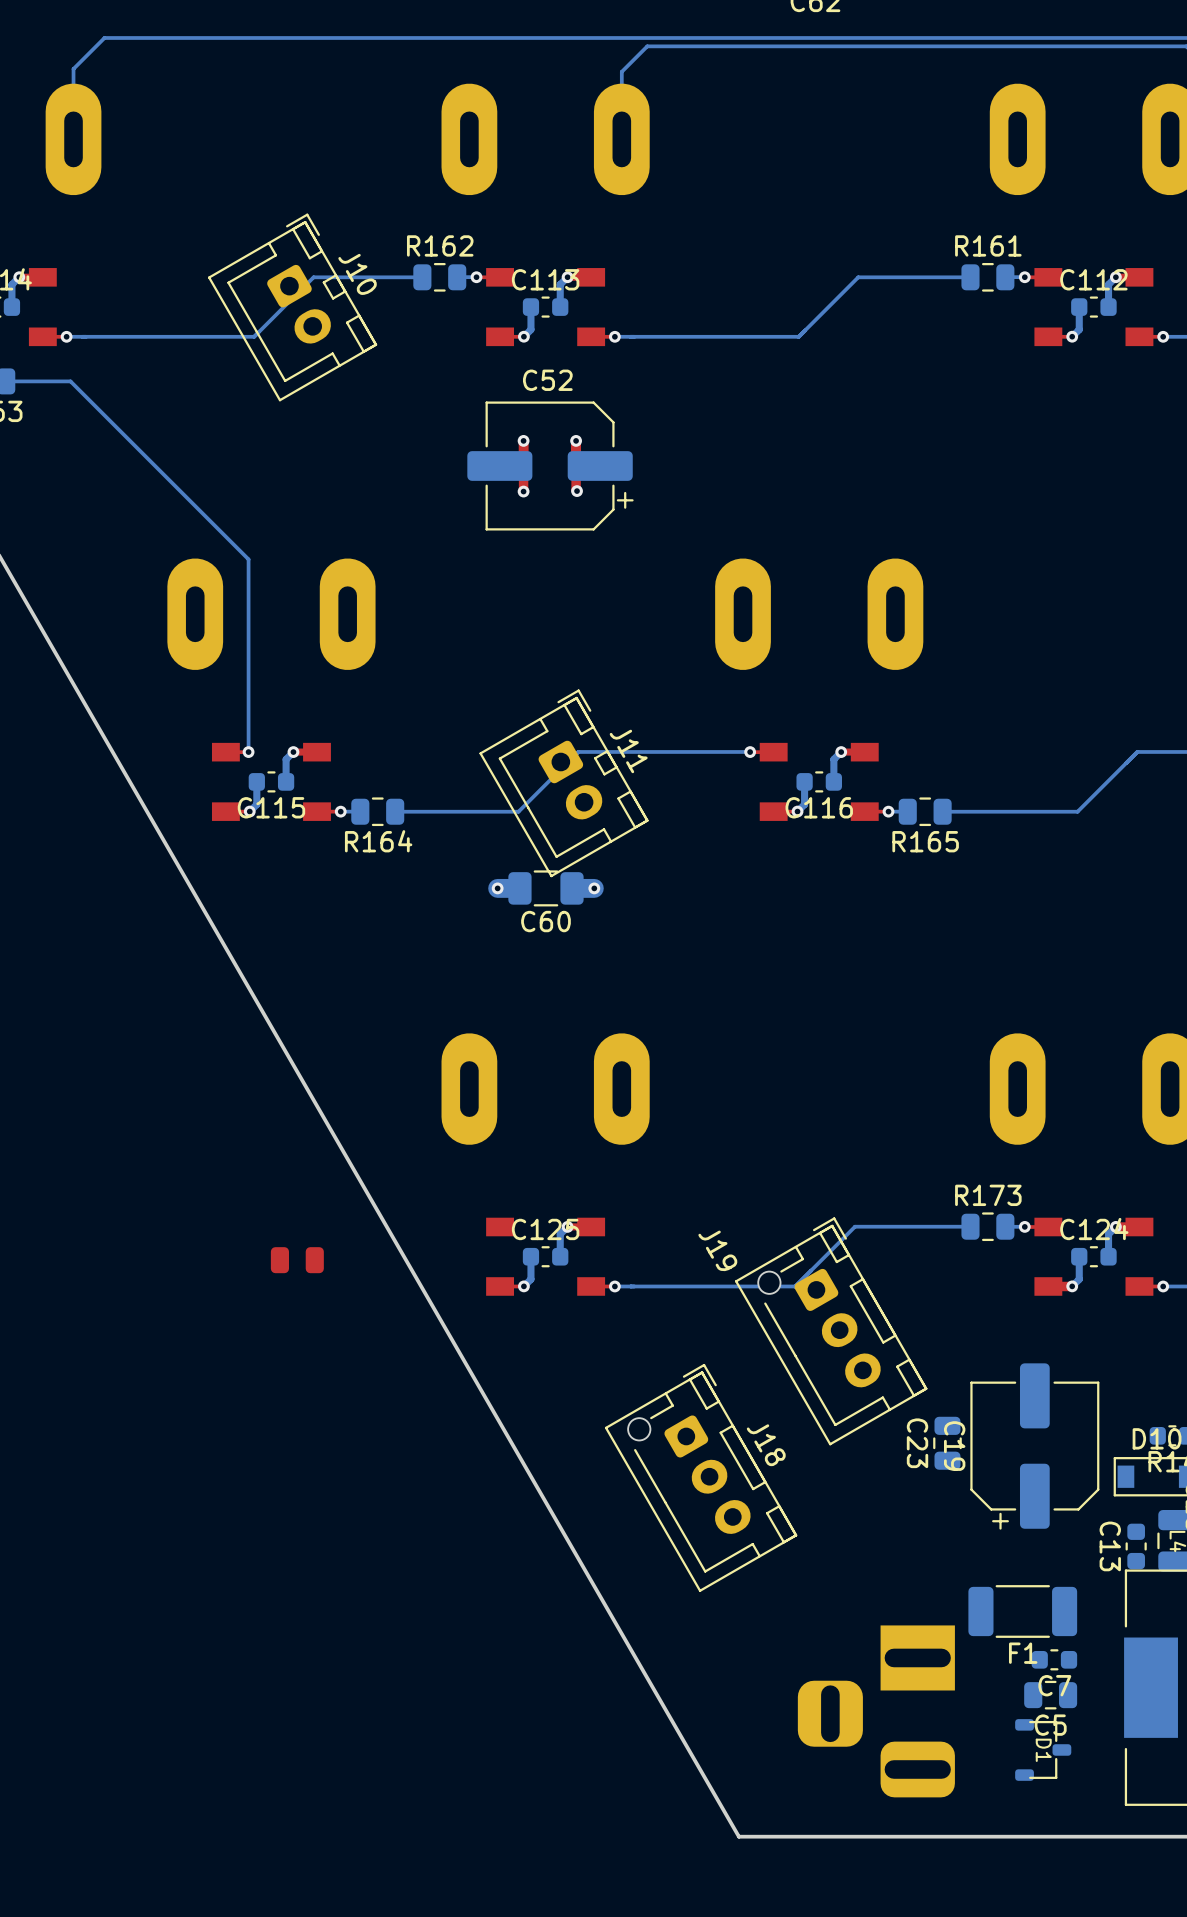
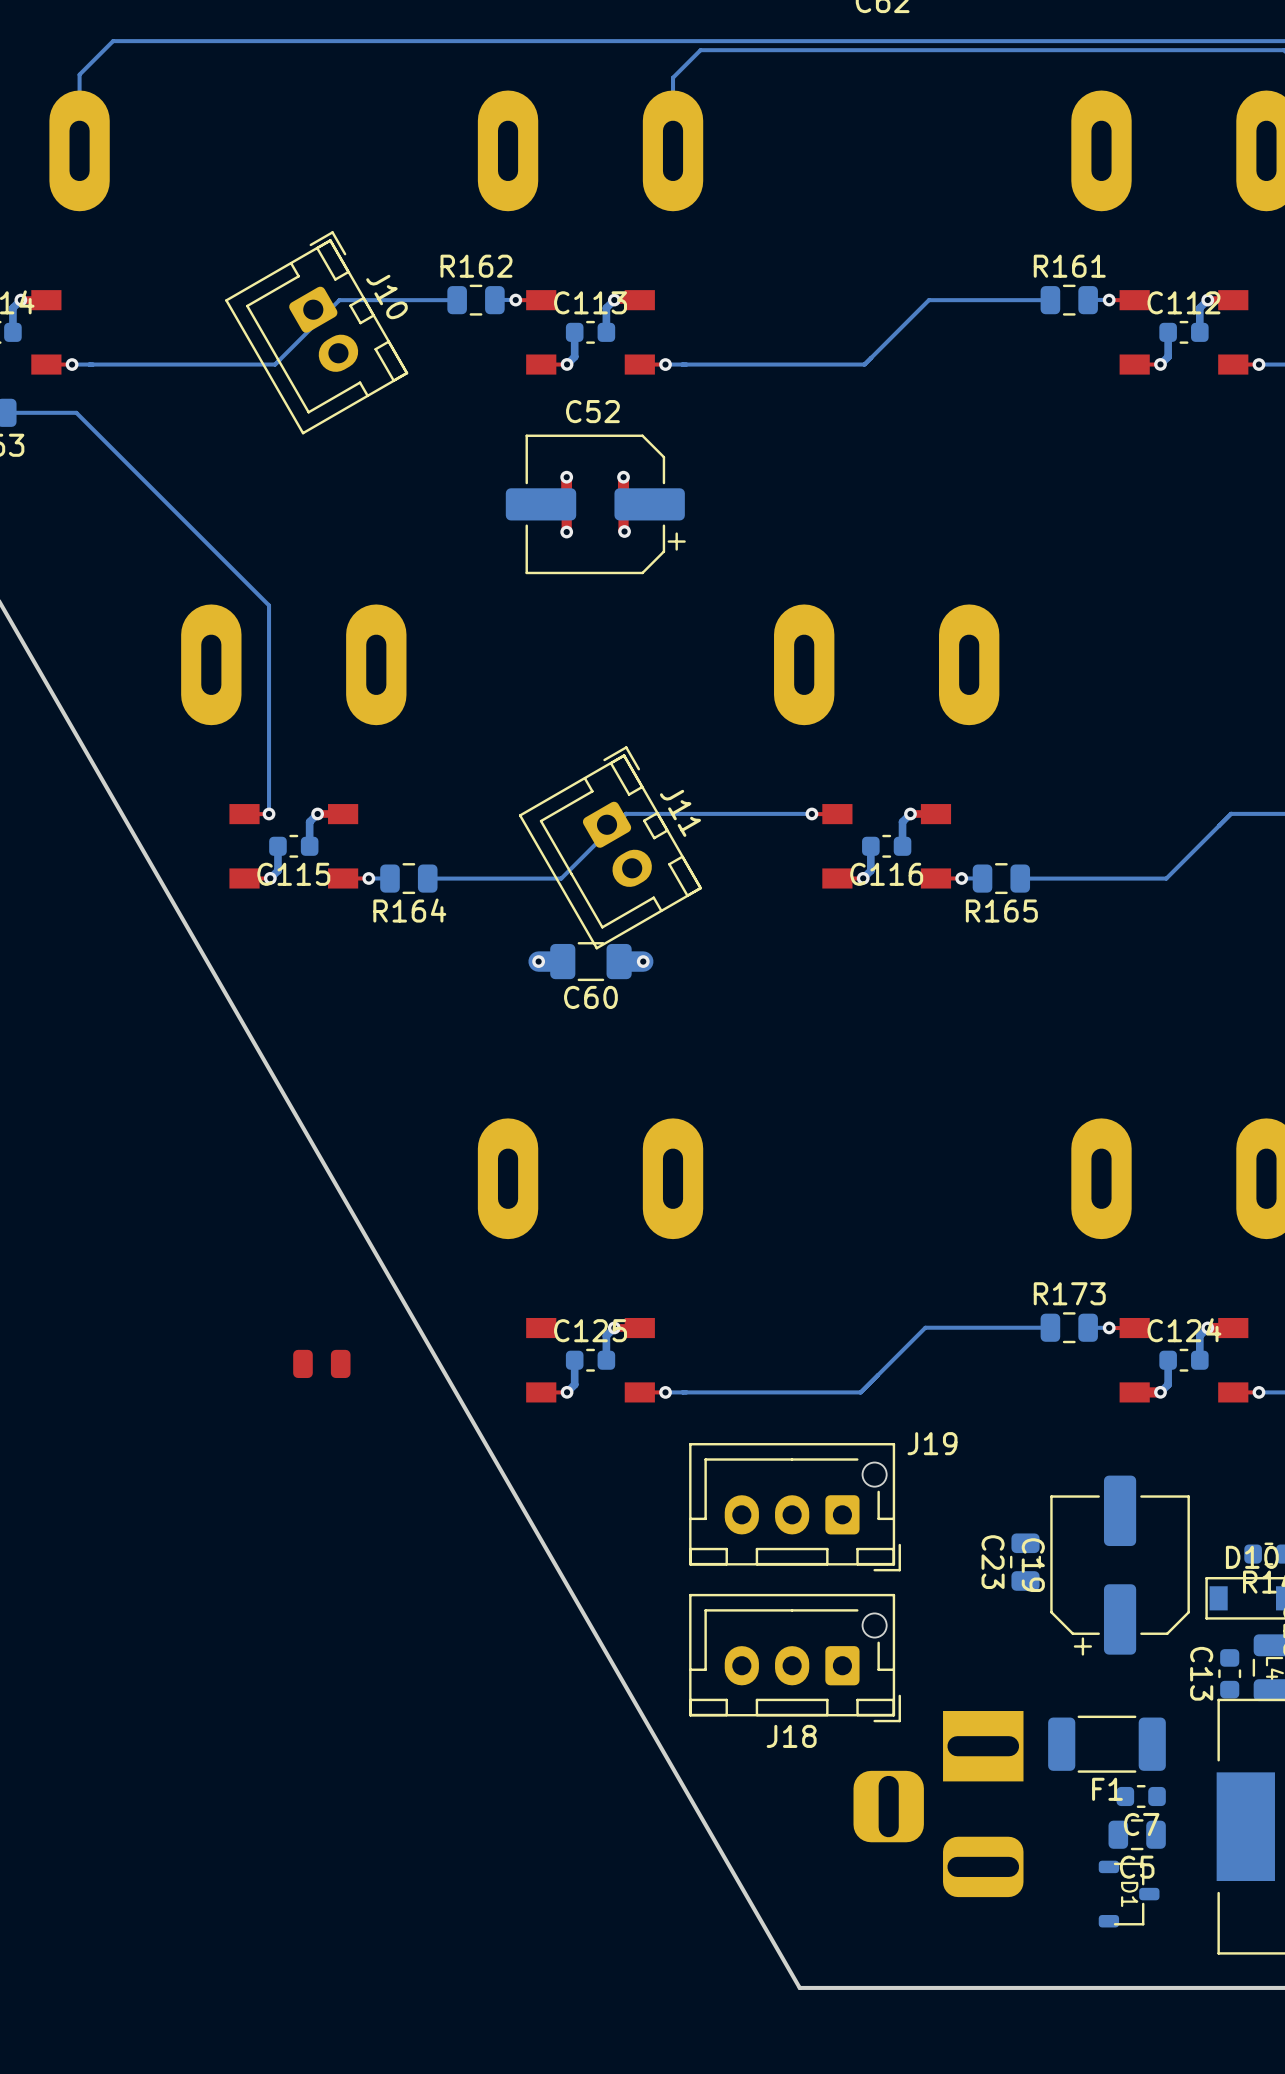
J19 rotation: 0° (831, 1331) -> 120° clockwise (795, 1507)
J18 rotation: 0° (701, 1477) -> 120° clockwise (795, 1658)
part position: (876, 1711) -> (938, 1804)

